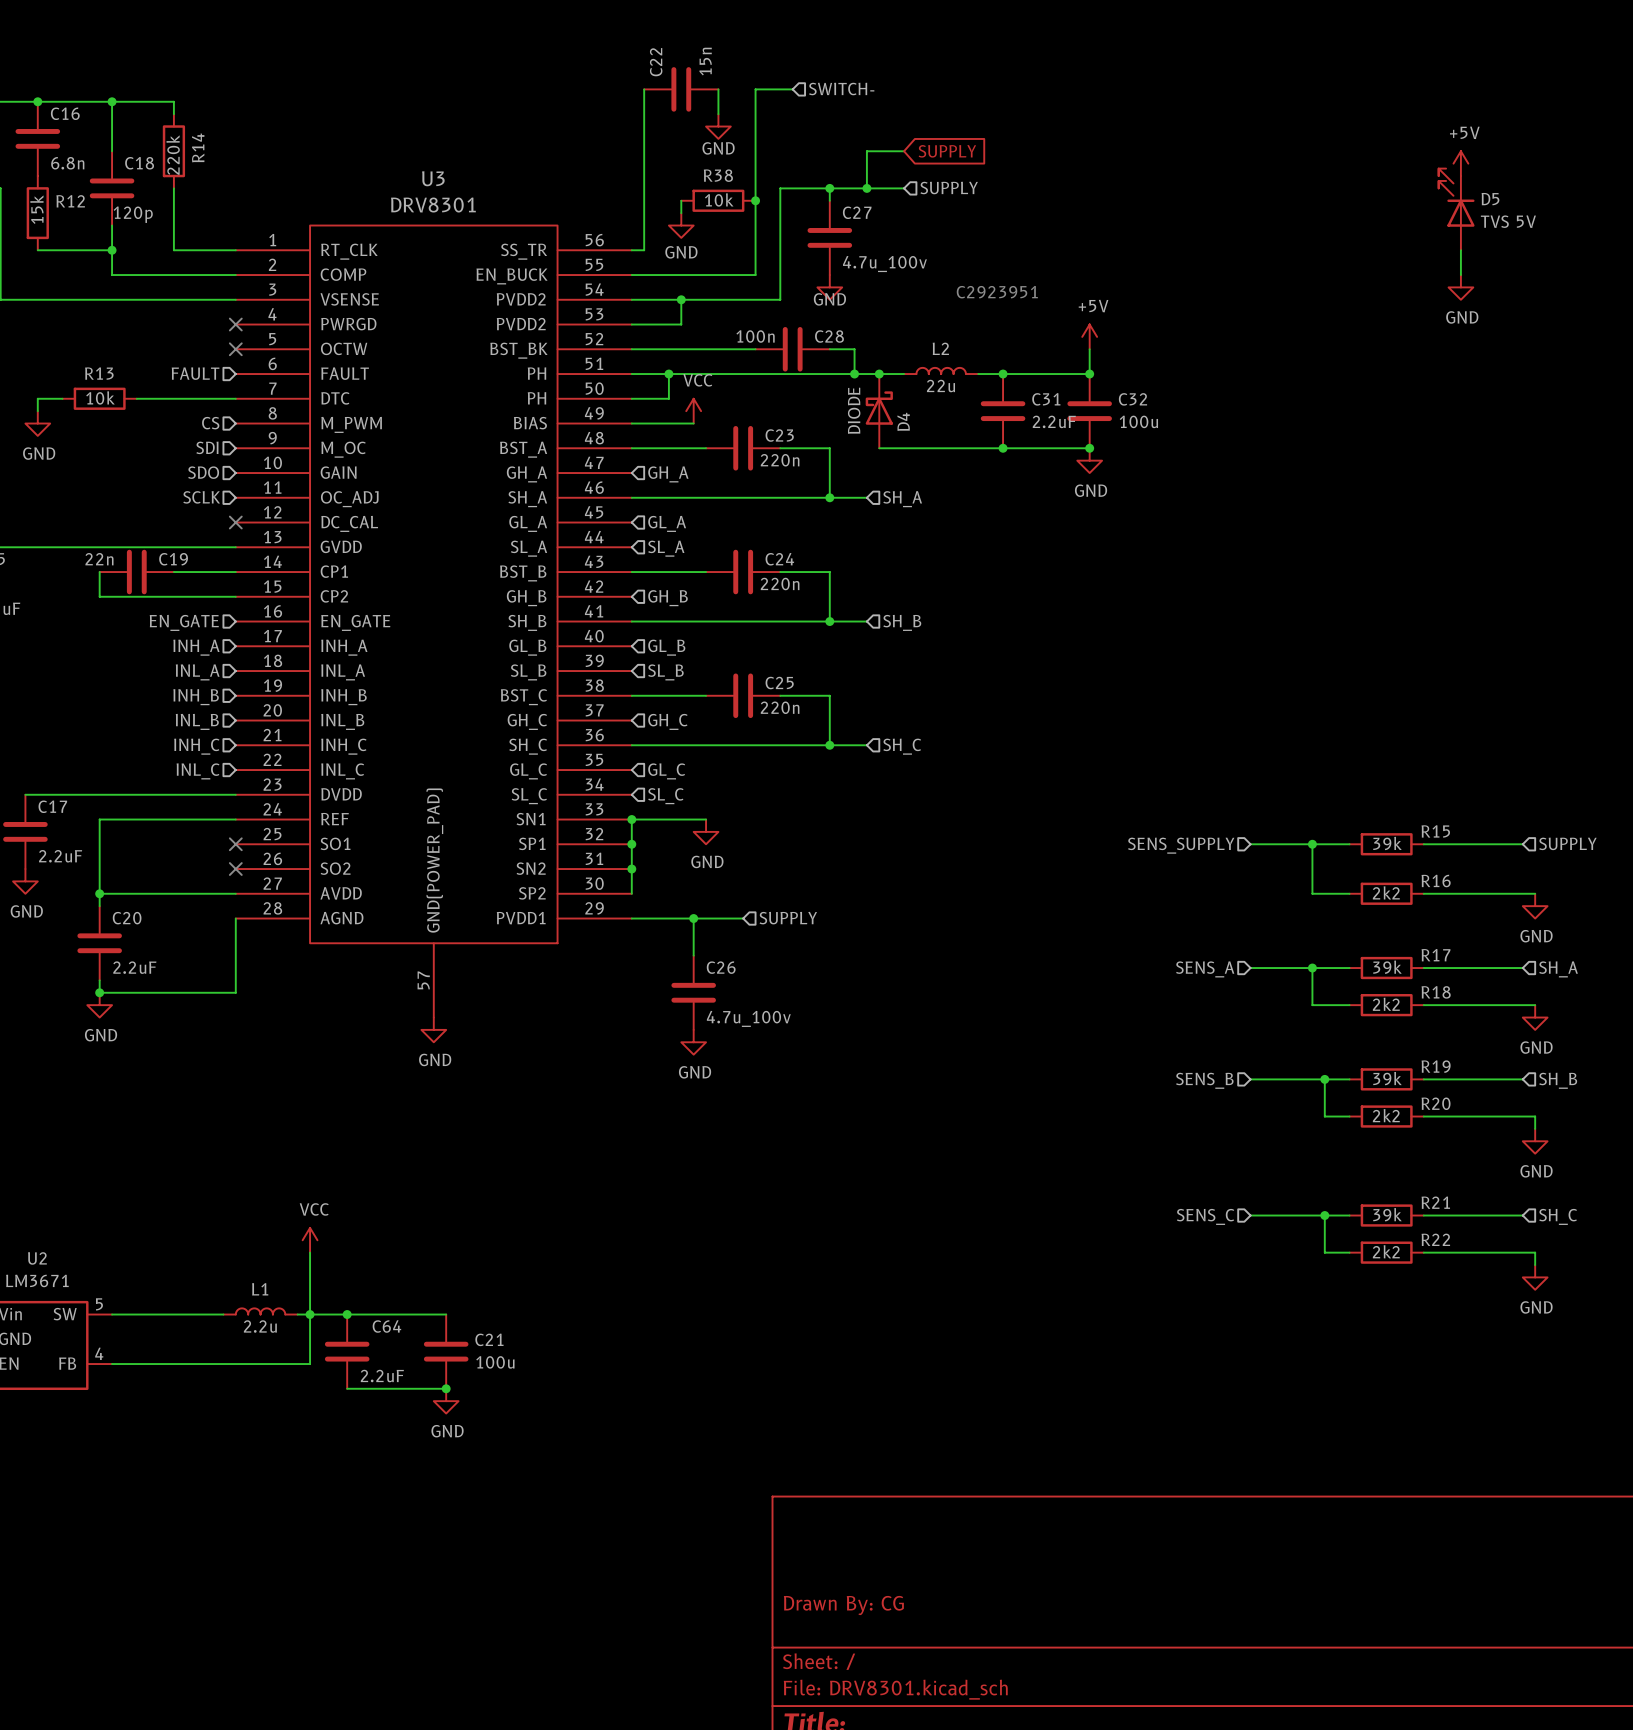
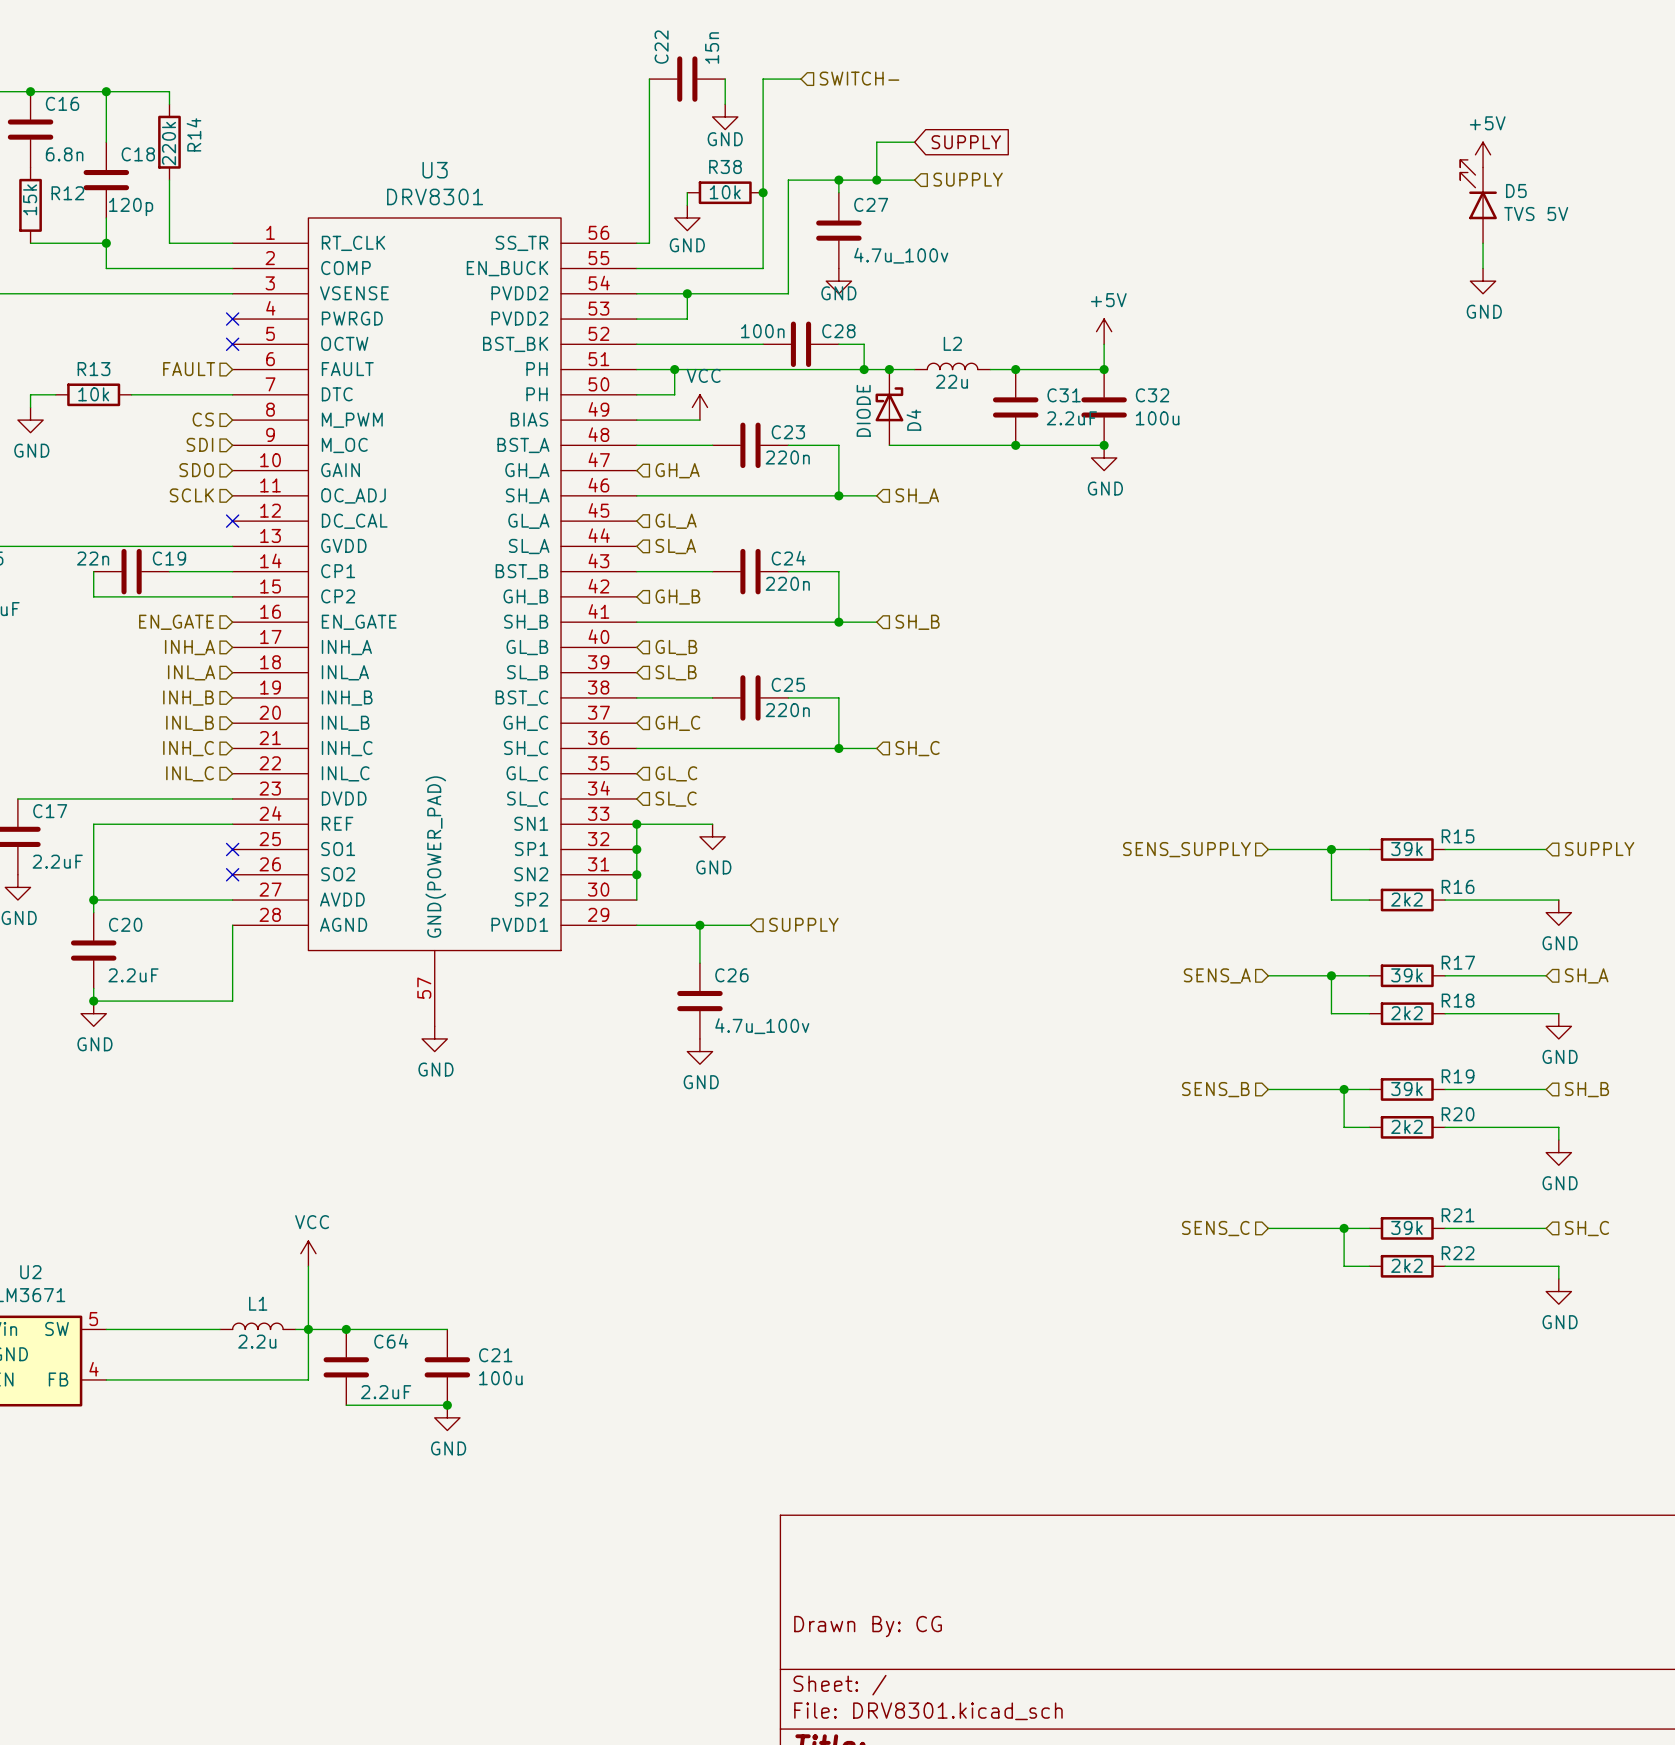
text: C2923951 (997, 292) -> none

